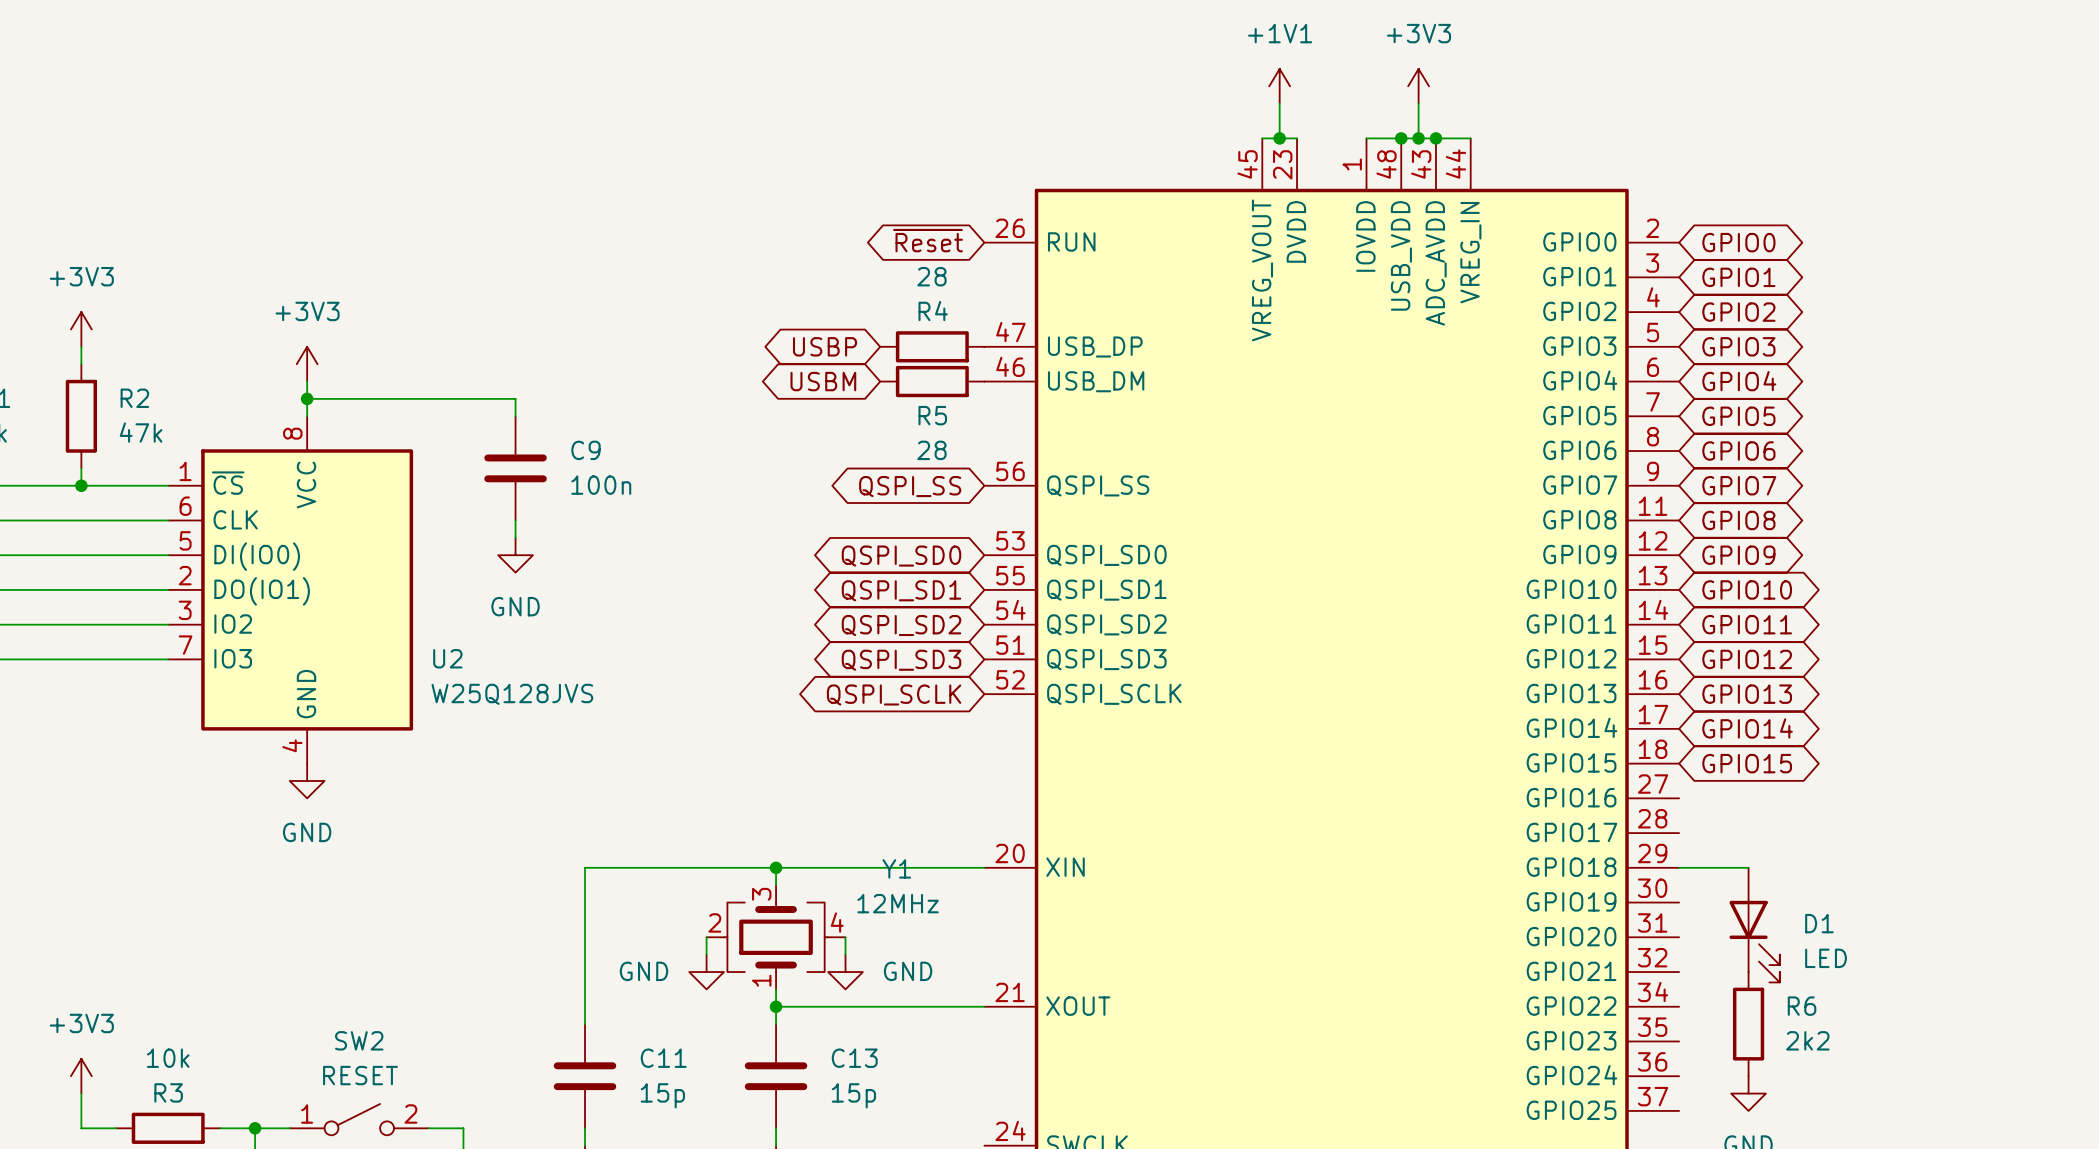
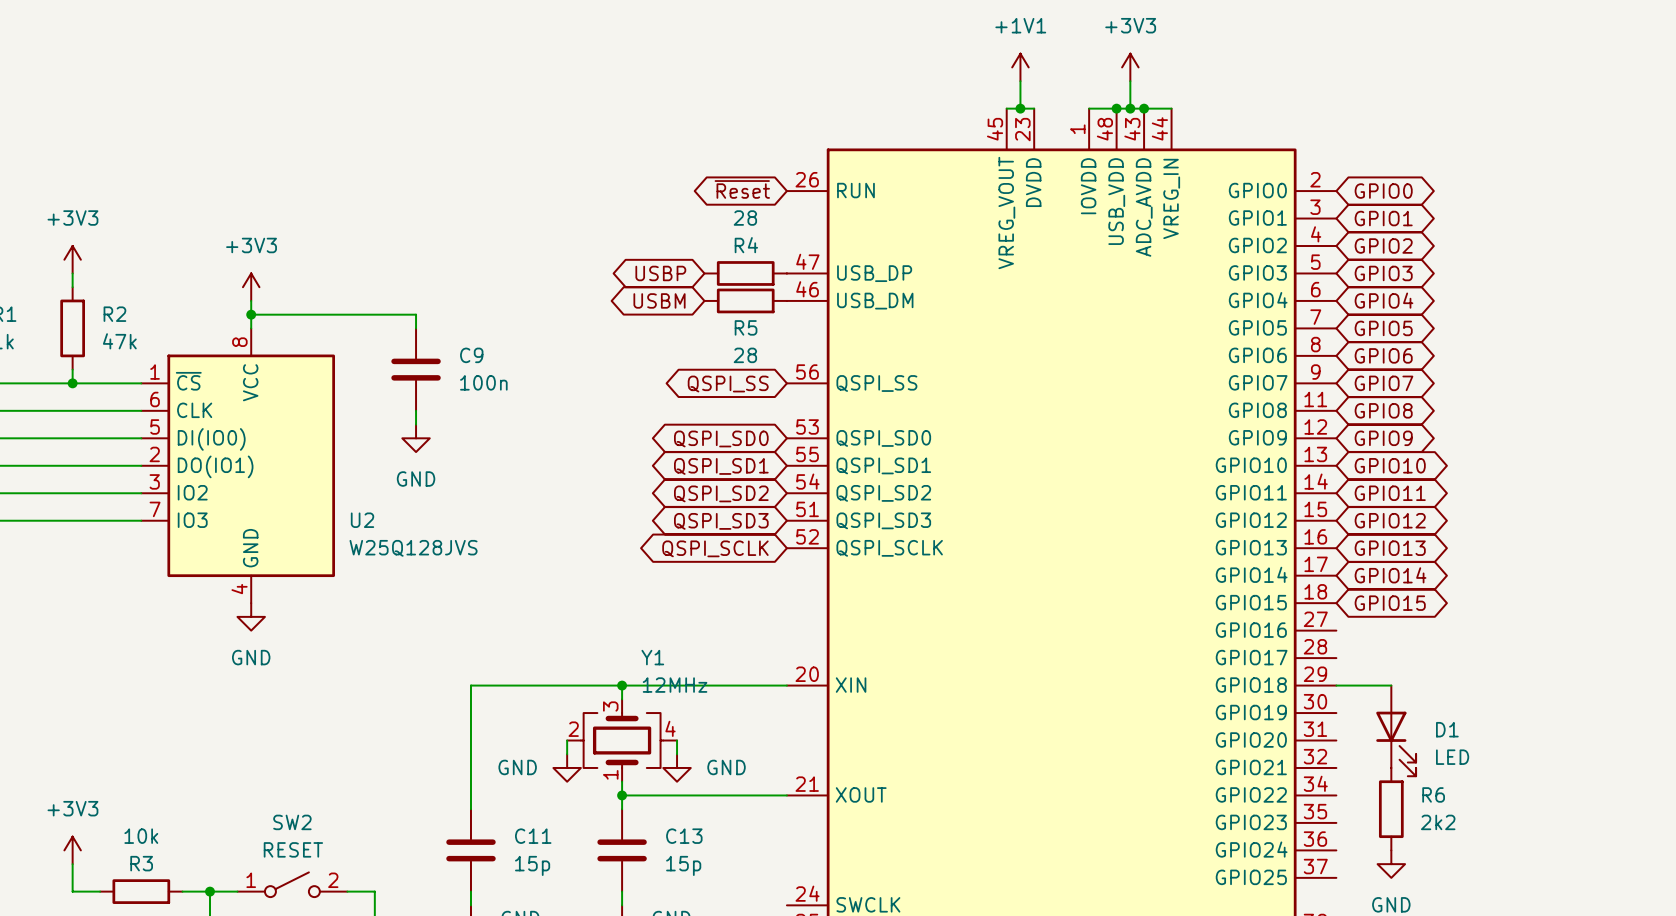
Y1 name position: Y1 (896, 868) -> Y1 (652, 657)
Y1 value position: 12MHz (898, 903) -> 12MHz (675, 685)

